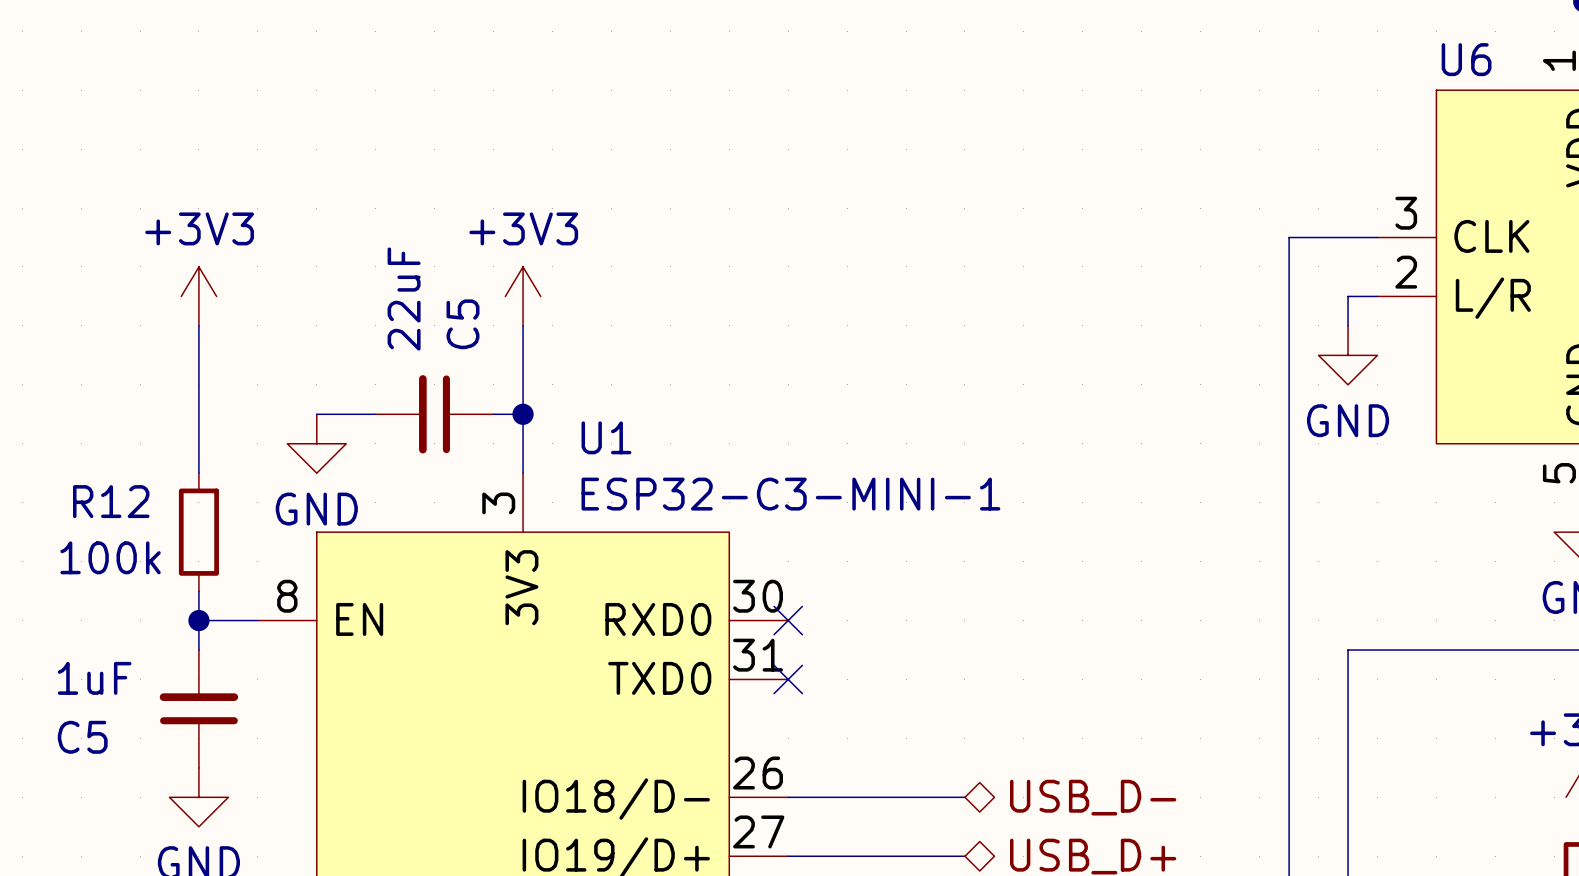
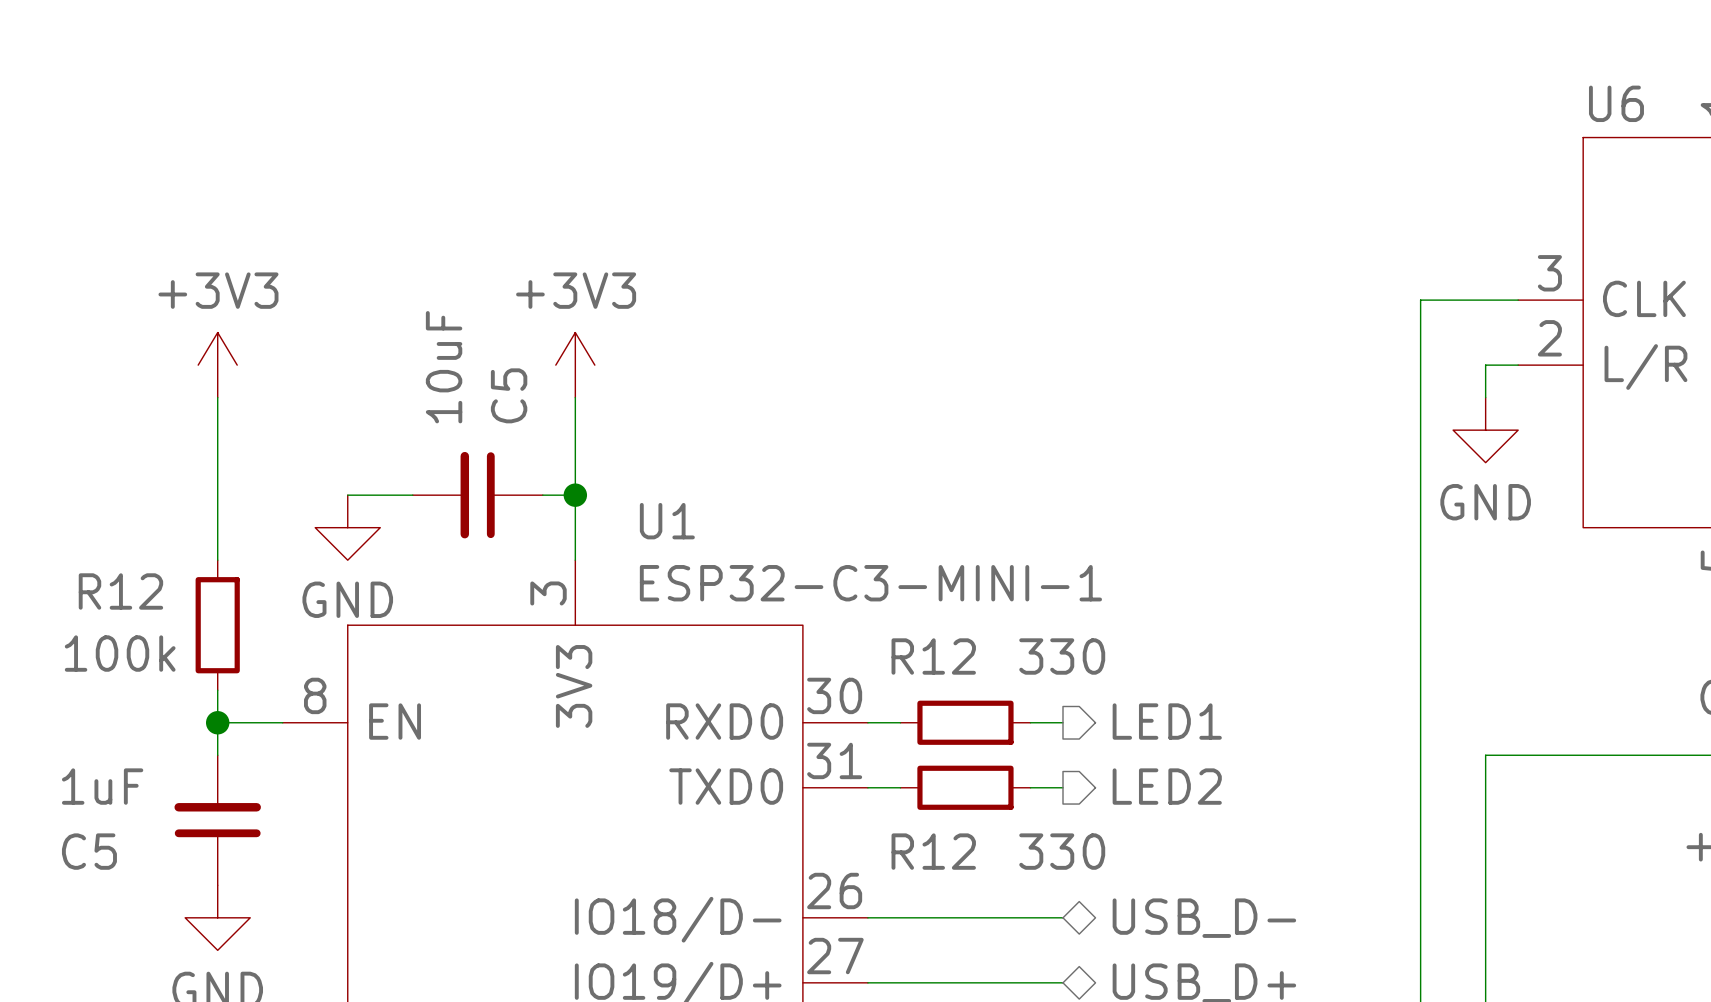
C5 value: 22uF (404, 299) -> 10uF (444, 367)
hierarchical label: none -> LED1 (1167, 721)
wire: none -> (867, 722) (900, 722)
no-connect mark: (788, 620) -> none
R12: none -> 330 (965, 722)
wire: none -> (1030, 722) (1063, 722)
hierarchical label: none -> LED2 (1167, 786)
wire: none -> (867, 787) (900, 787)
no-connect mark: (788, 679) -> none
R12: none -> 330 (965, 787)
wire: none -> (1030, 787) (1063, 787)

